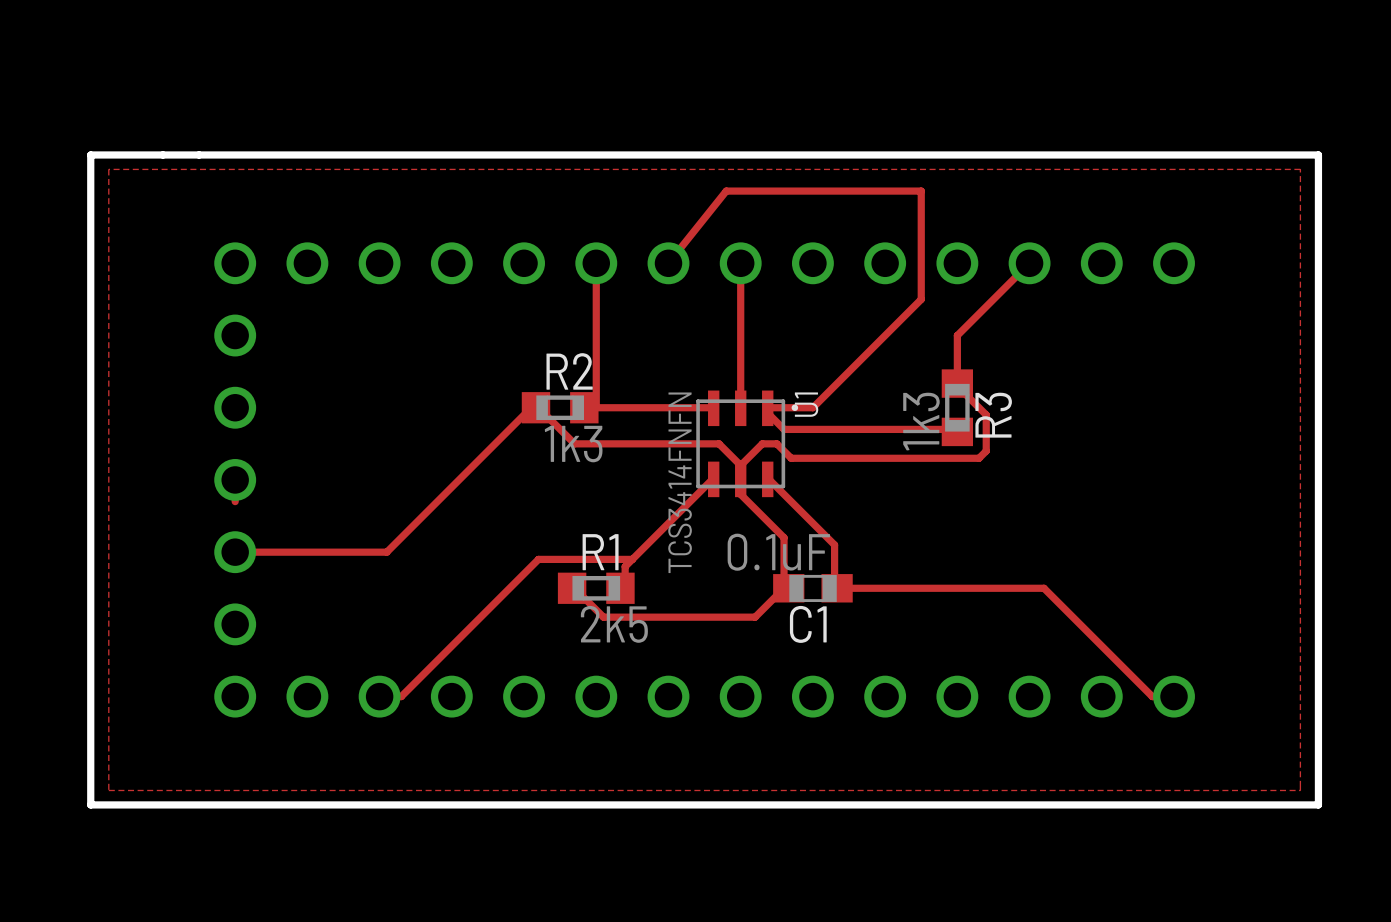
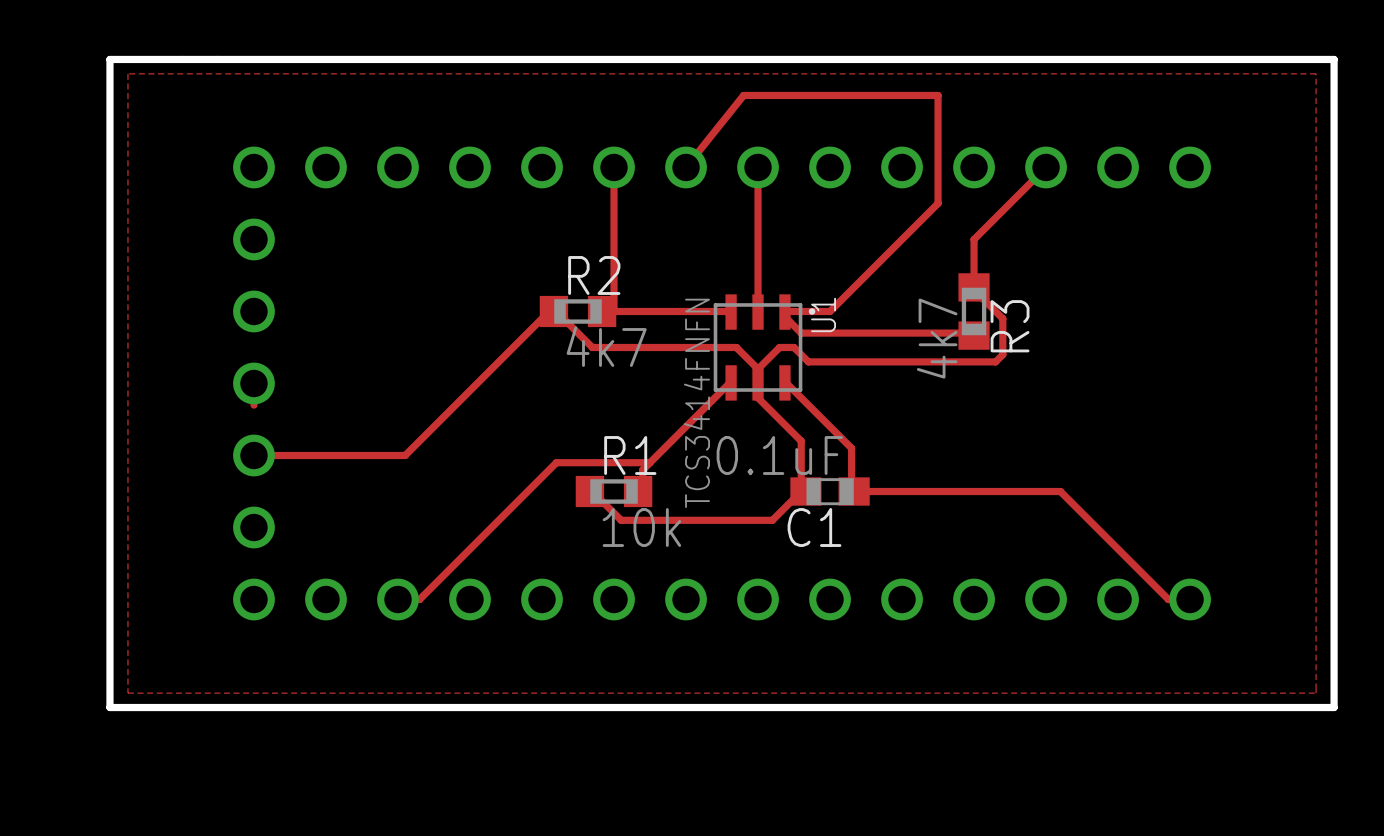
R3 value: 1k3 (921, 421) -> 4k7 (937, 338)
R2 value: 1k3 (573, 444) -> 4k7 (606, 346)
R1 value: 2k5 (614, 624) -> 10k (641, 527)

